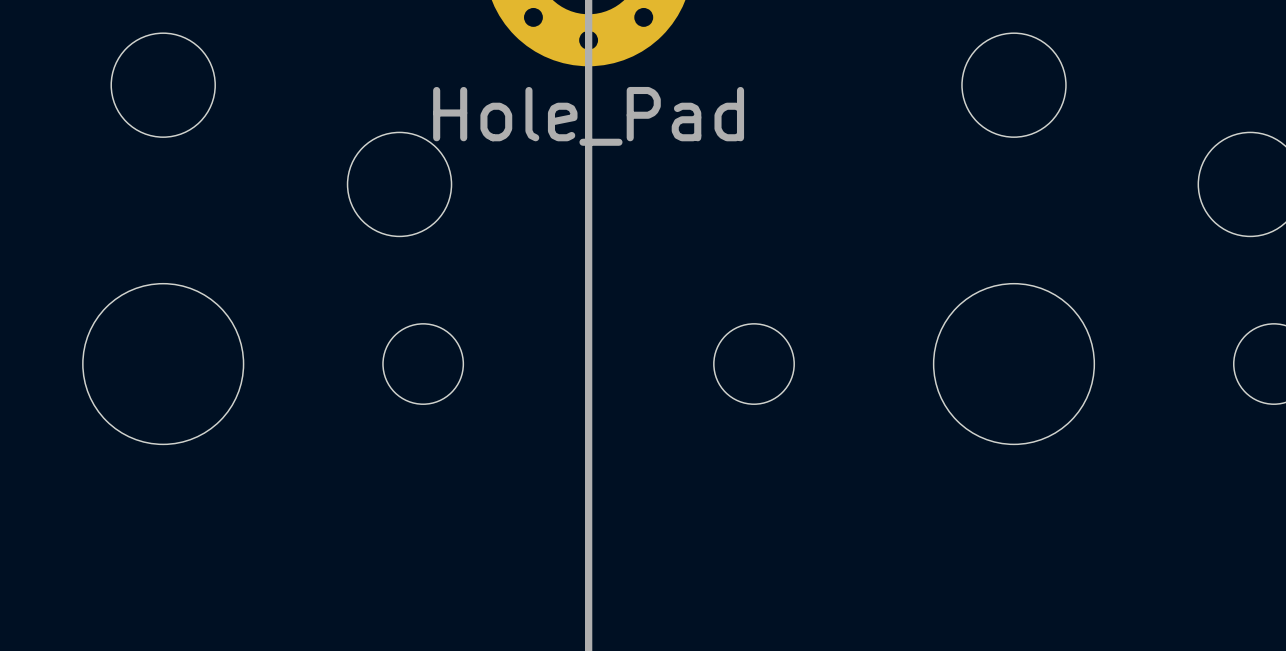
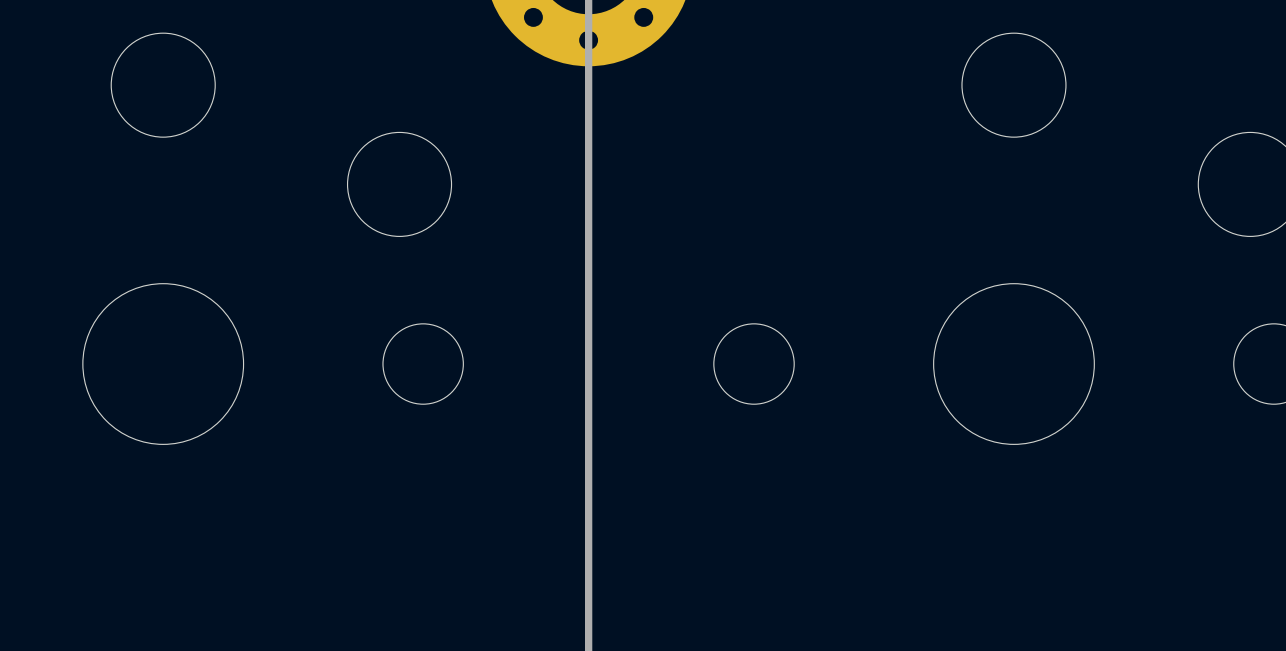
part value: Hole_Pad (588, 116) -> none

